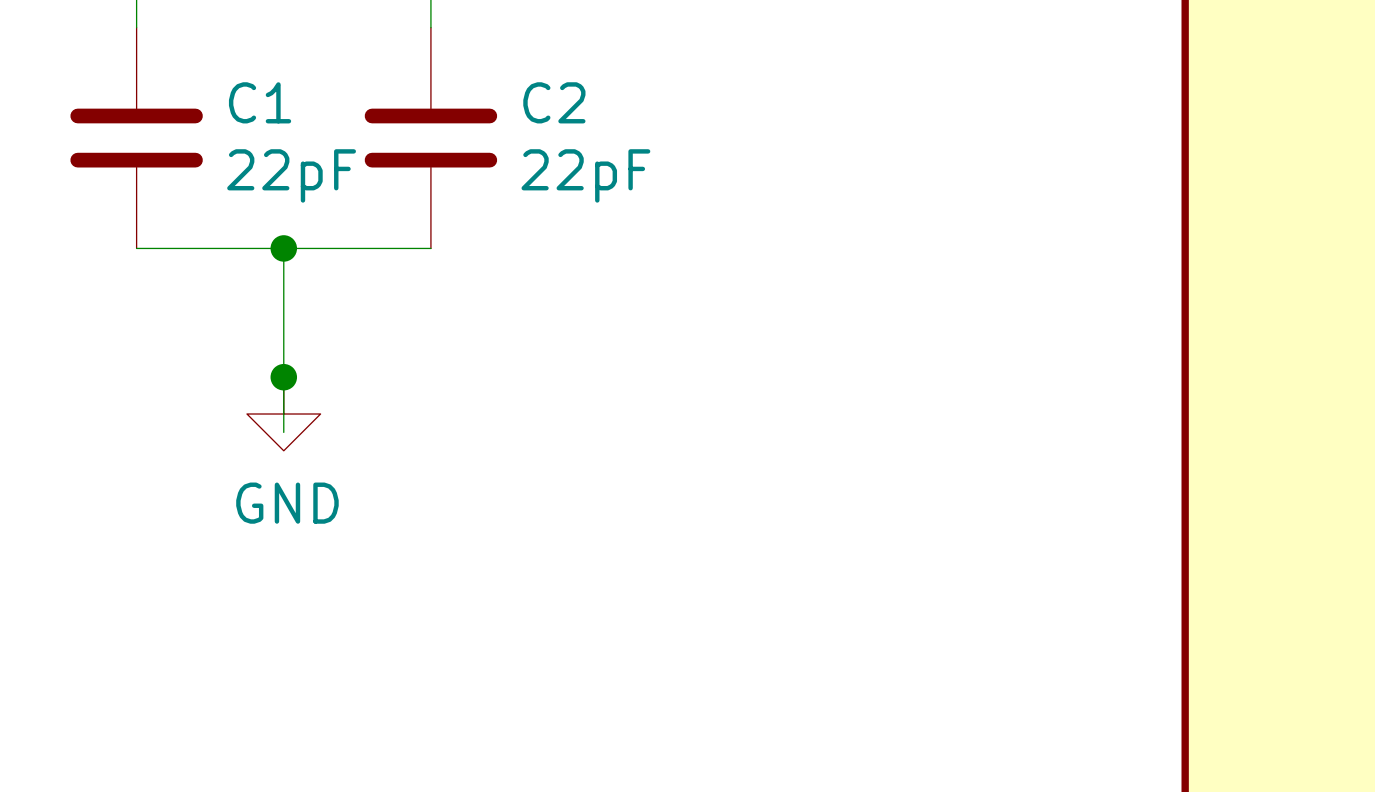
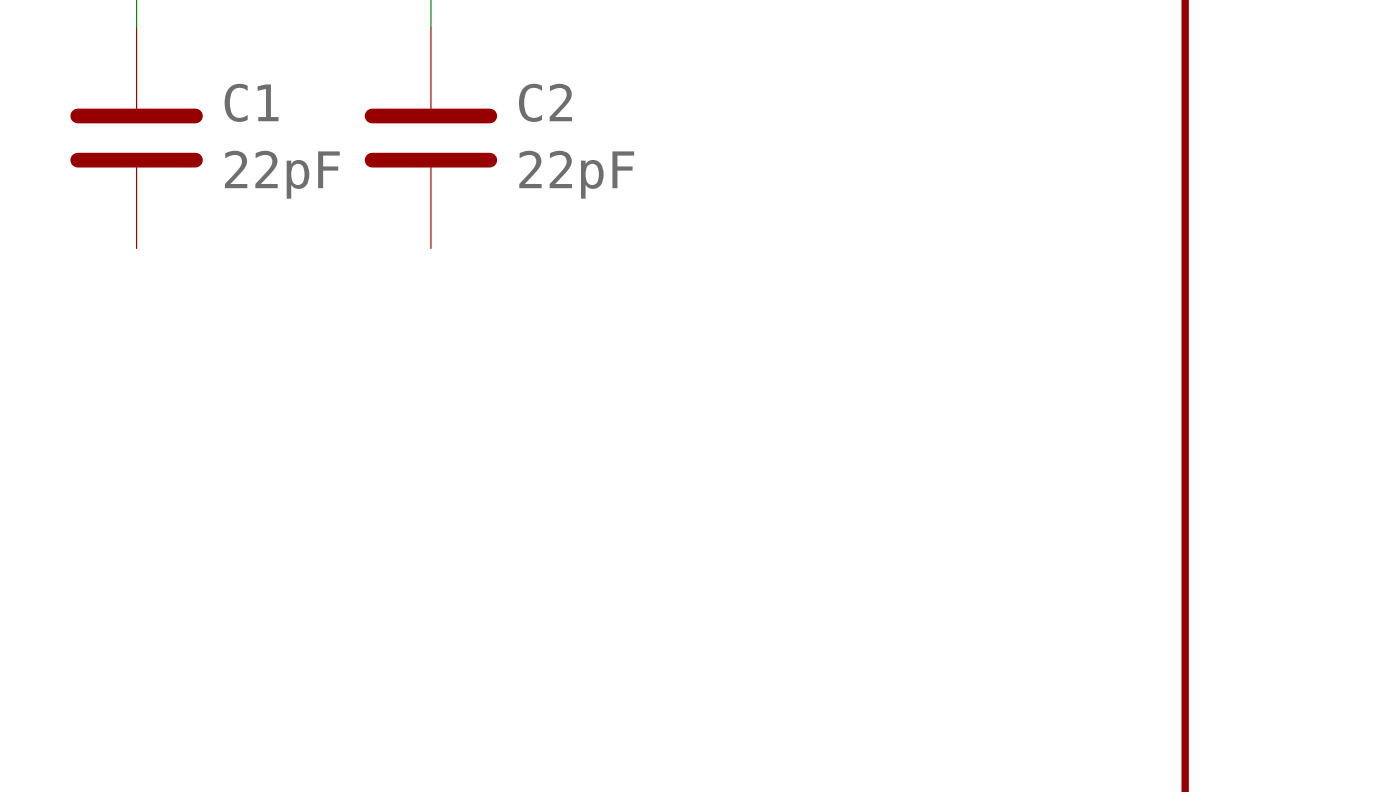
wire: (136, 248) (430, 248) -> none
wire: (283, 248) (283, 432) -> none
junction: (283, 248) -> none
junction: (283, 377) -> none
power symbol: GND (283, 414) -> none

